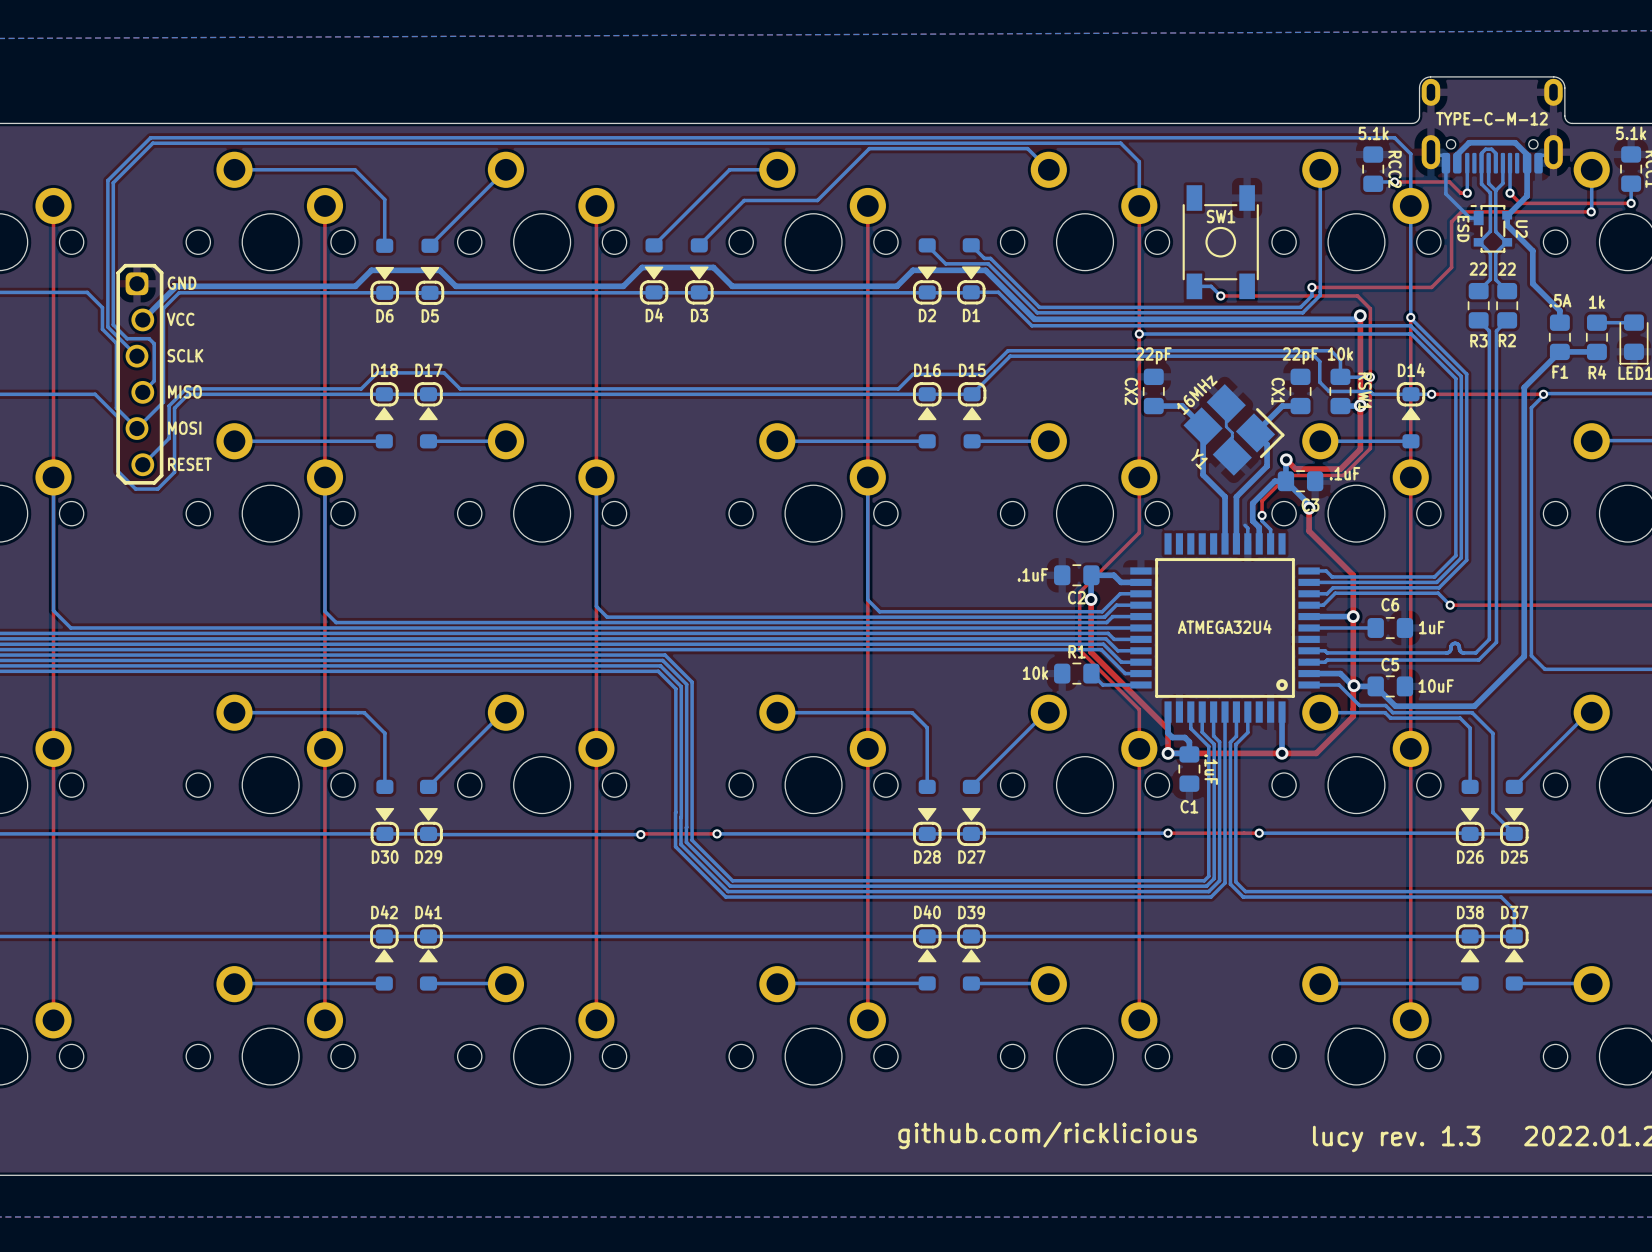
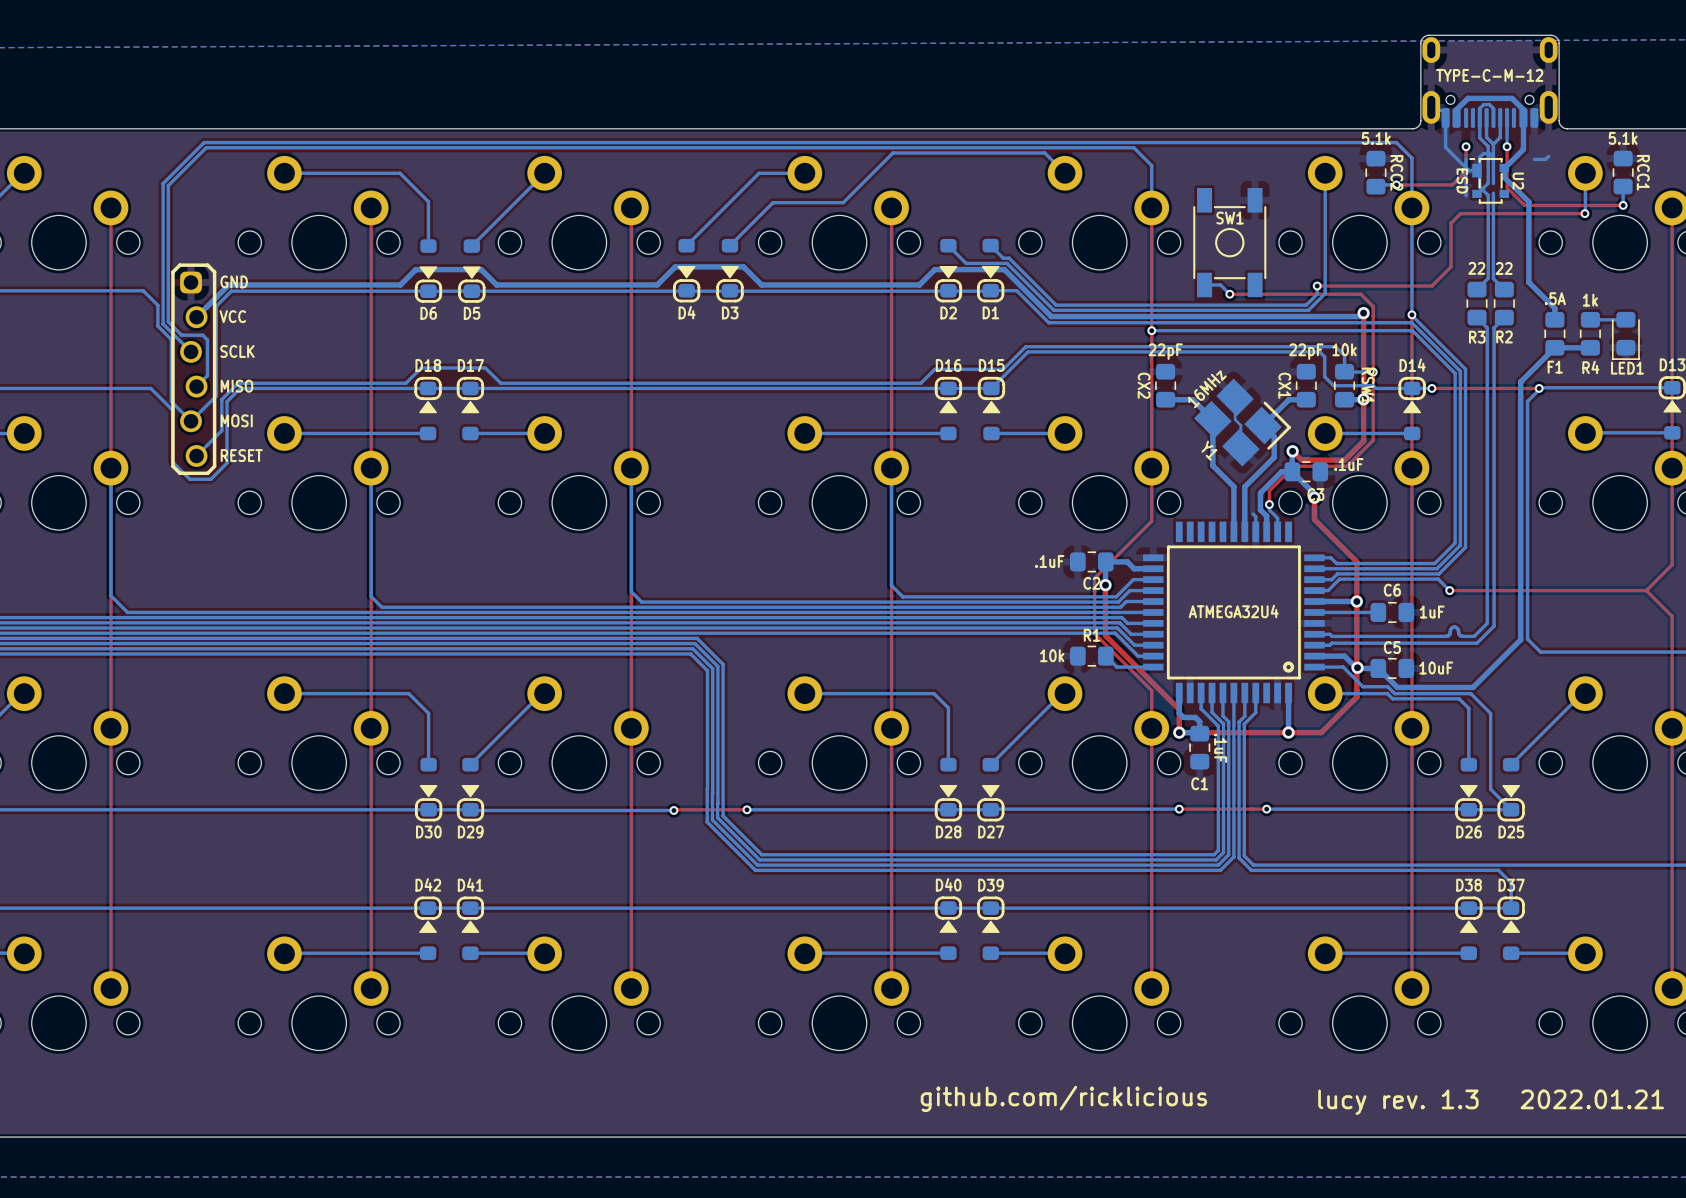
bottom track: none -> (1486, 110) (1486, 137) (1493, 144)
bottom track: none -> (1493, 110) (1489, 104) (1483, 104) (1479, 108) (1479, 137) (1488, 146) (1488, 183) (1477, 193)
bottom track: none -> (1500, 110) (1500, 137) (1493, 144)
board edge: (1572, 123) (1567, 121) (1565, 117) (1564, 85) (1557, 77) (1430, 76) (1423, 79) (1420, 84) (1419, 117) (1416, 121) (1411, 123) -> (1567, 128) (1561, 126) (1559, 121) (1559, 43) (1555, 36) (1550, 35) (1429, 35) (1424, 36) (1420, 42) (1420, 121) (1418, 126) (1412, 128)
part position: (1492, 126) -> (1490, 82)
via: none -> (1466, 146)
via: none -> (1507, 146)
bottom track: (1430, 152) (1434, 155) (1445, 155) (1445, 193) (1470, 218) (1478, 218) -> (1431, 107) (1434, 110) (1445, 110) (1445, 147) (1468, 170) (1477, 170)
bottom track: (1457, 155) (1469, 142) (1515, 142) (1527, 154) (1527, 196) (1507, 215) (1507, 225) (1532, 250) -> (1456, 110) (1467, 98) (1512, 98) (1523, 109) (1523, 149) (1504, 167) (1504, 177) (1528, 202) (1528, 250)
bottom track: (1502, 155) (1502, 183) (1495, 190) (1488, 183) (1488, 155) -> none
bottom track: (1510, 155) (1510, 193) -> (1507, 110) (1507, 146)
top track: (1449, 181) (1460, 193) (1467, 193) -> (1449, 184) (1452, 184) (1466, 171) (1466, 146)
via: (1467, 193) -> none
top track: (1510, 193) (1520, 203) (1528, 203) -> (1507, 146) (1507, 187) (1524, 205)
via: (1510, 193) -> none
U2 position: (1491, 228) -> (1489, 180)
bottom track: (1490, 231) (1479, 242) -> (1488, 232) (1488, 253)
bottom track: (1495, 231) (1506, 242) -> (1493, 232) (1493, 253)
bottom track: (1479, 242) (1490, 253) -> none
bottom track: (1506, 242) (1495, 253) -> none

